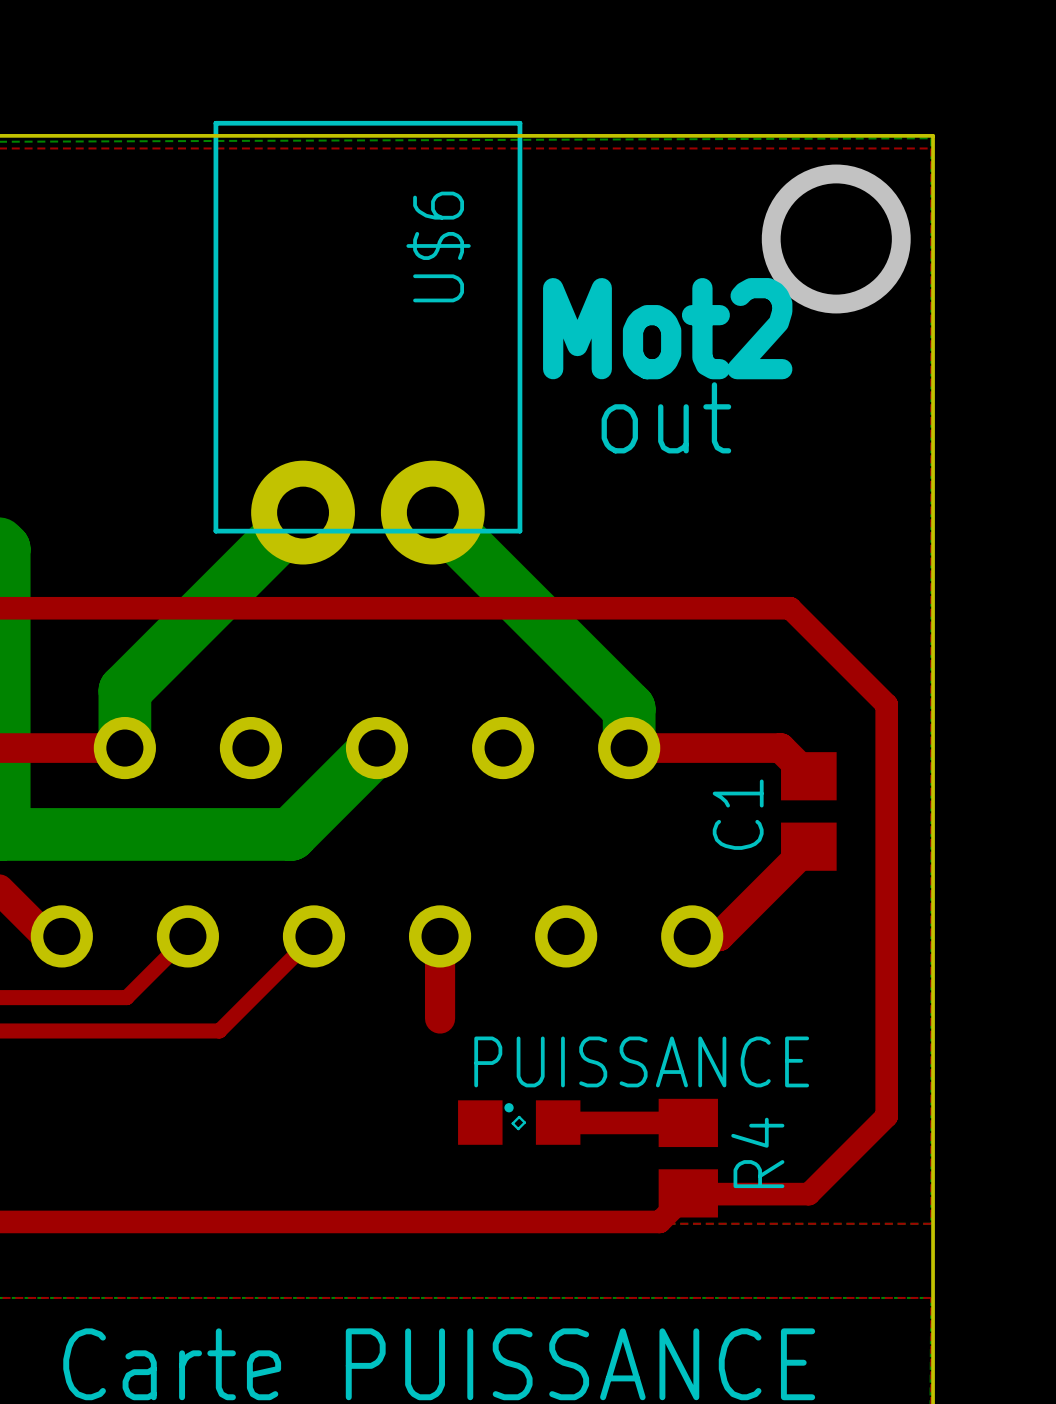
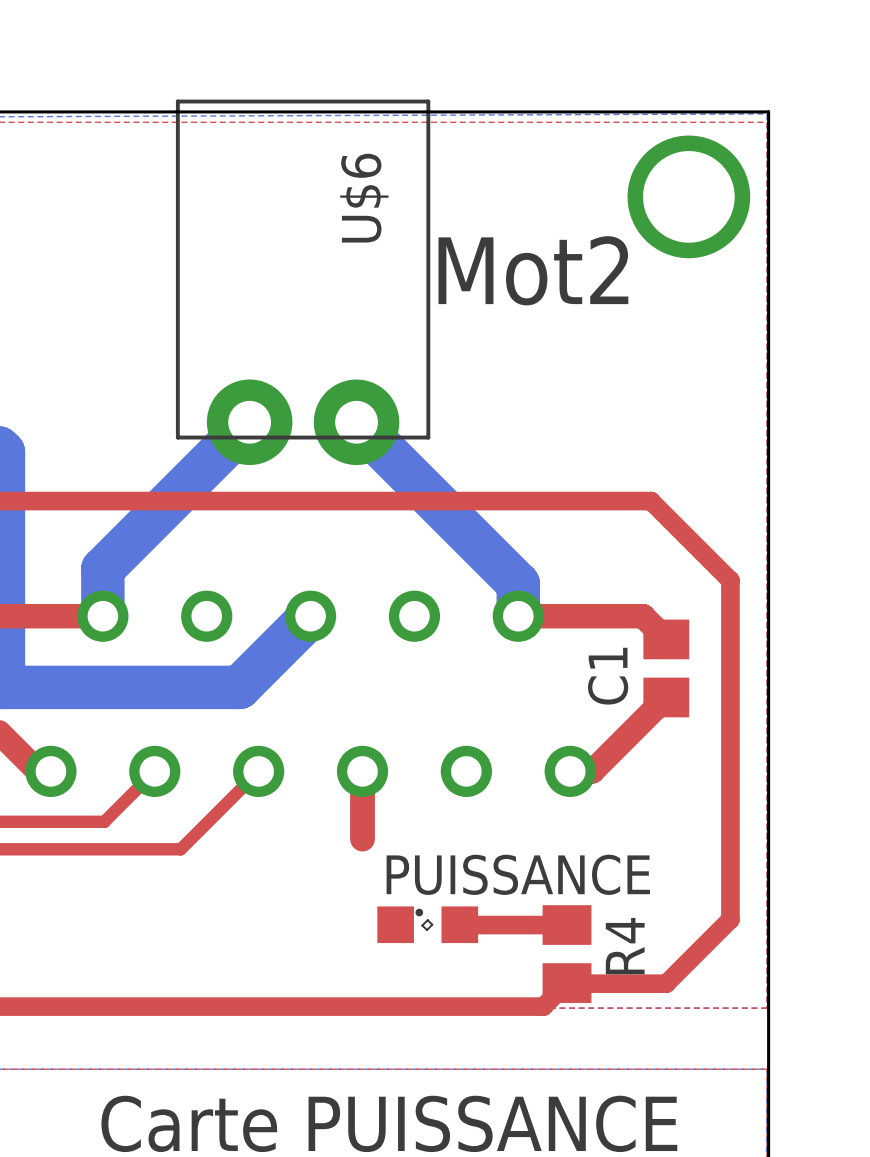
text: out (666, 417) -> none

